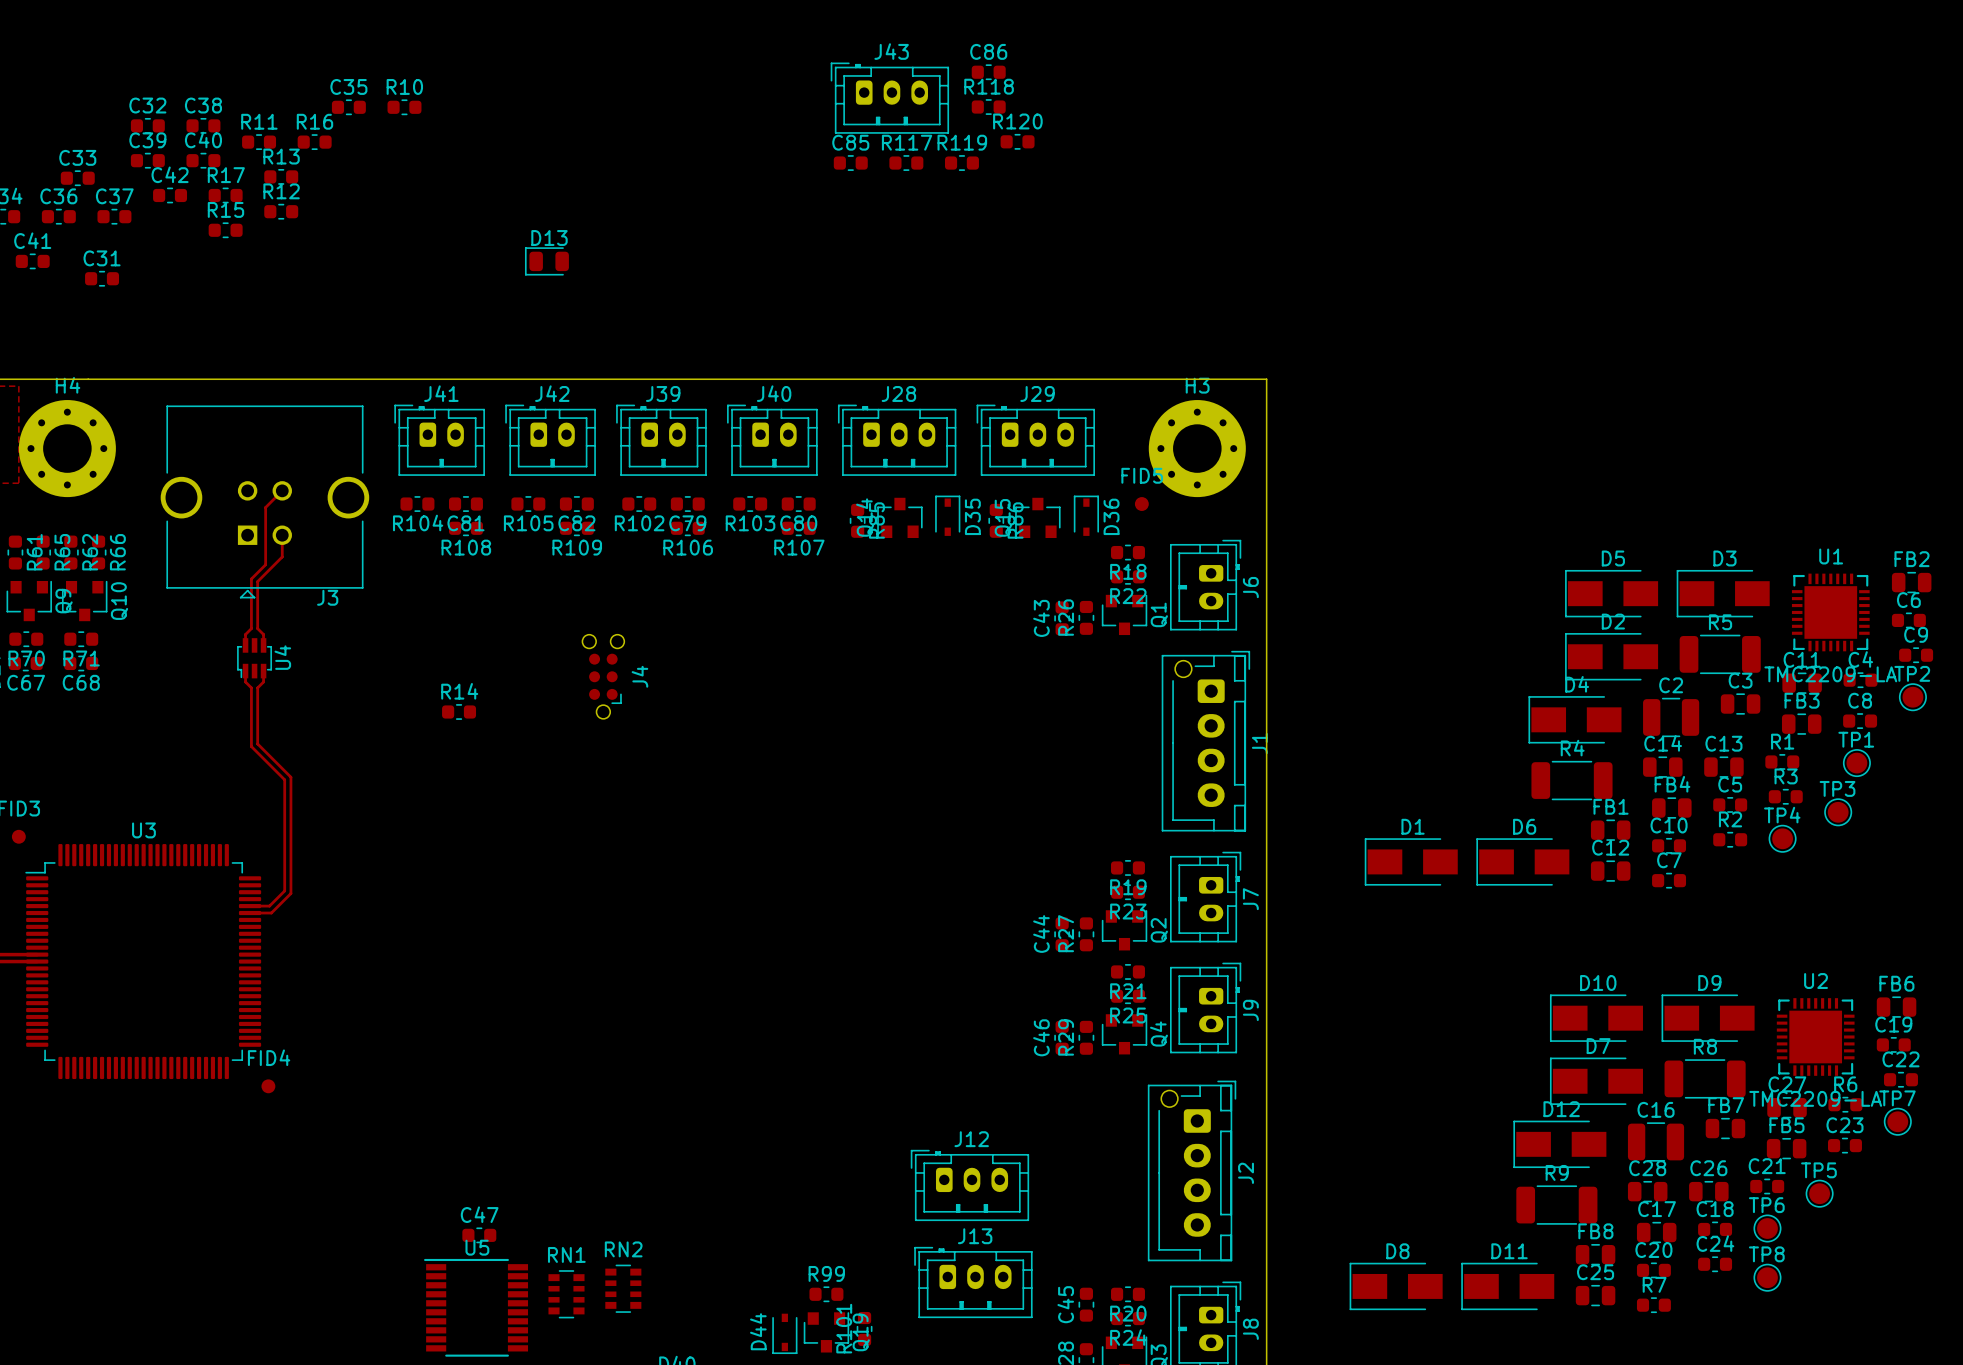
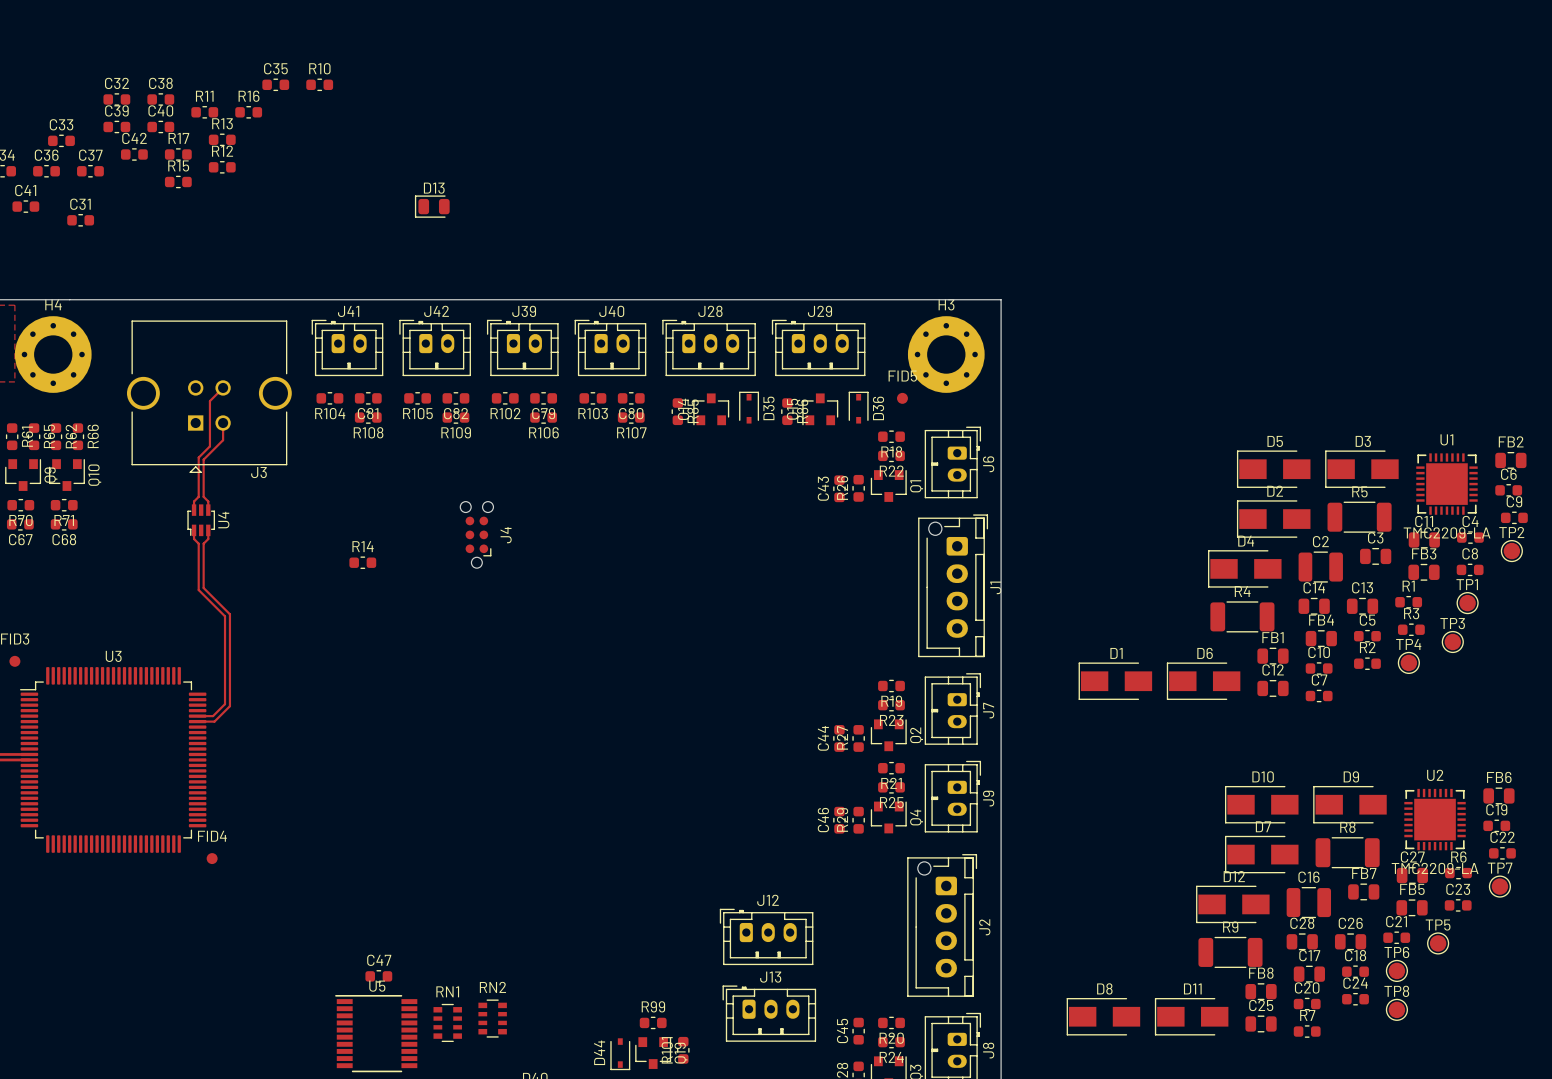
C86: (988, 72) -> none
J43: (889, 98) -> none
R118: (988, 107) -> none
R120: (1017, 141) -> none
C85: (850, 163) -> none
R117: (906, 163) -> none
R119: (961, 163) -> none

